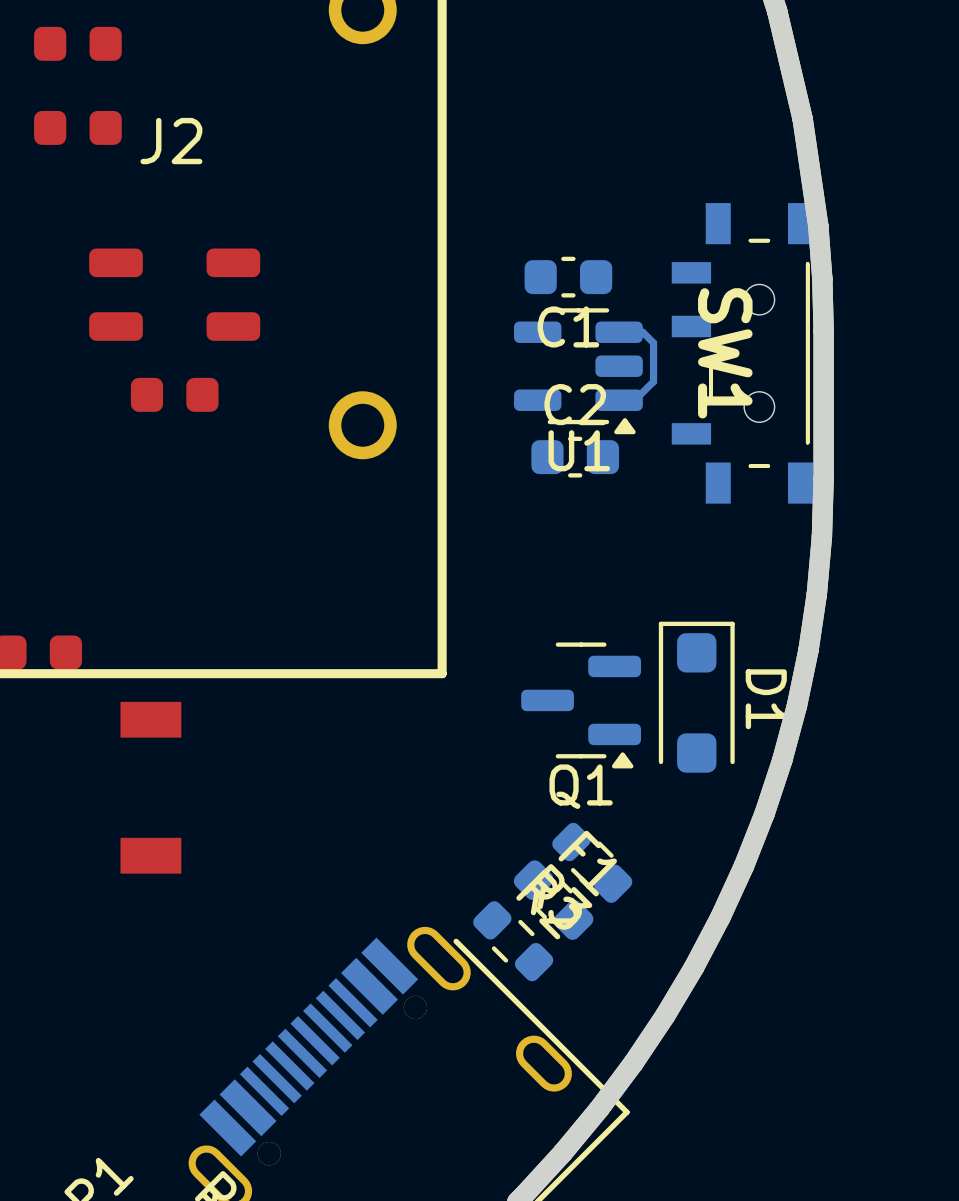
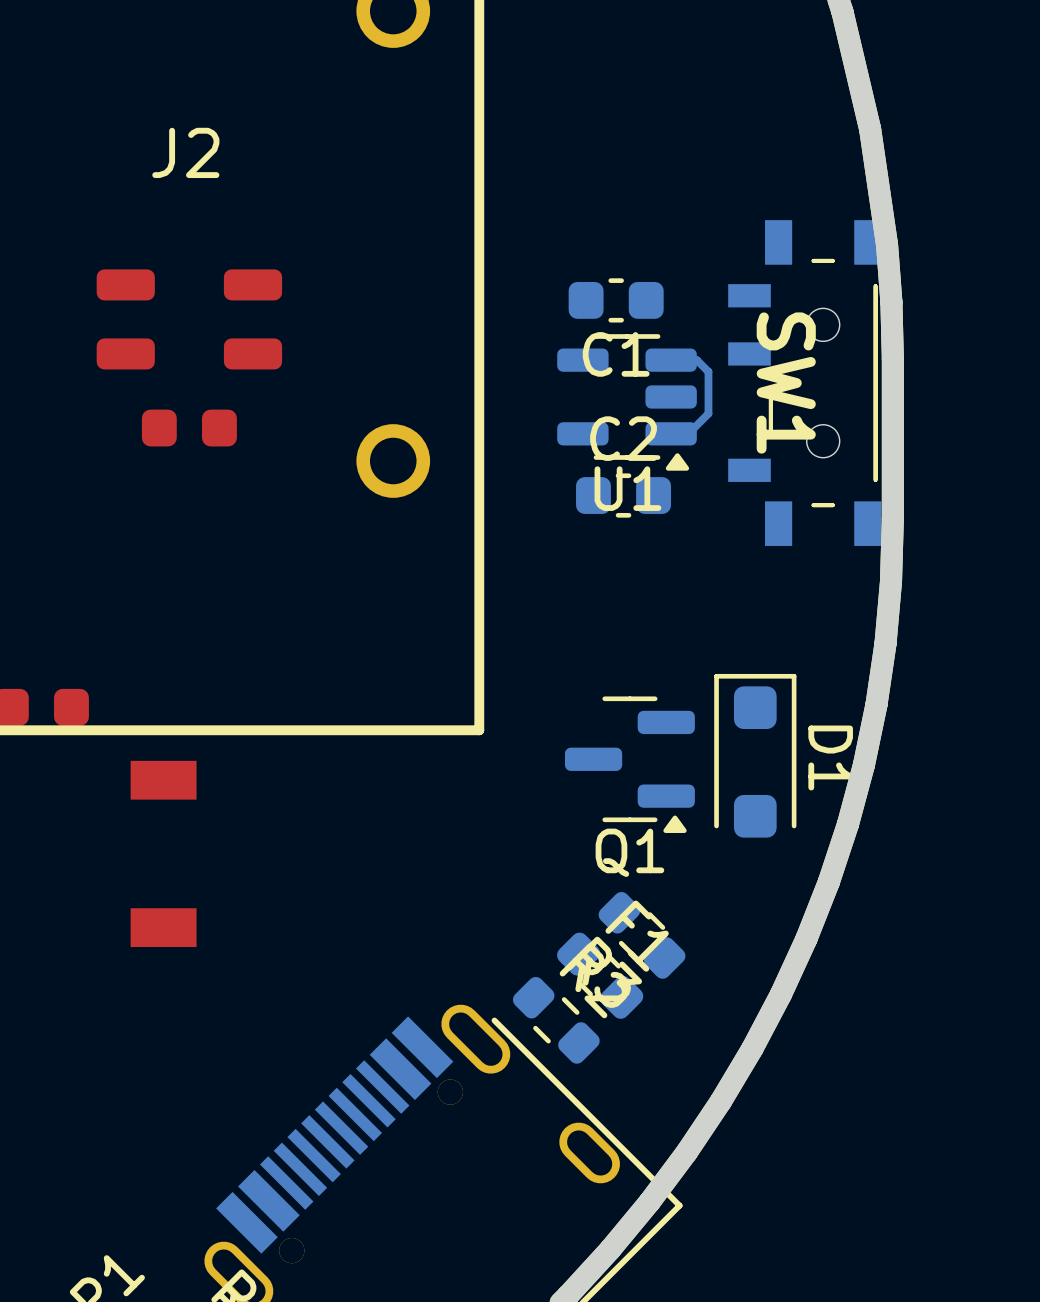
part: (77, 43) -> none
part: (77, 127) -> none

